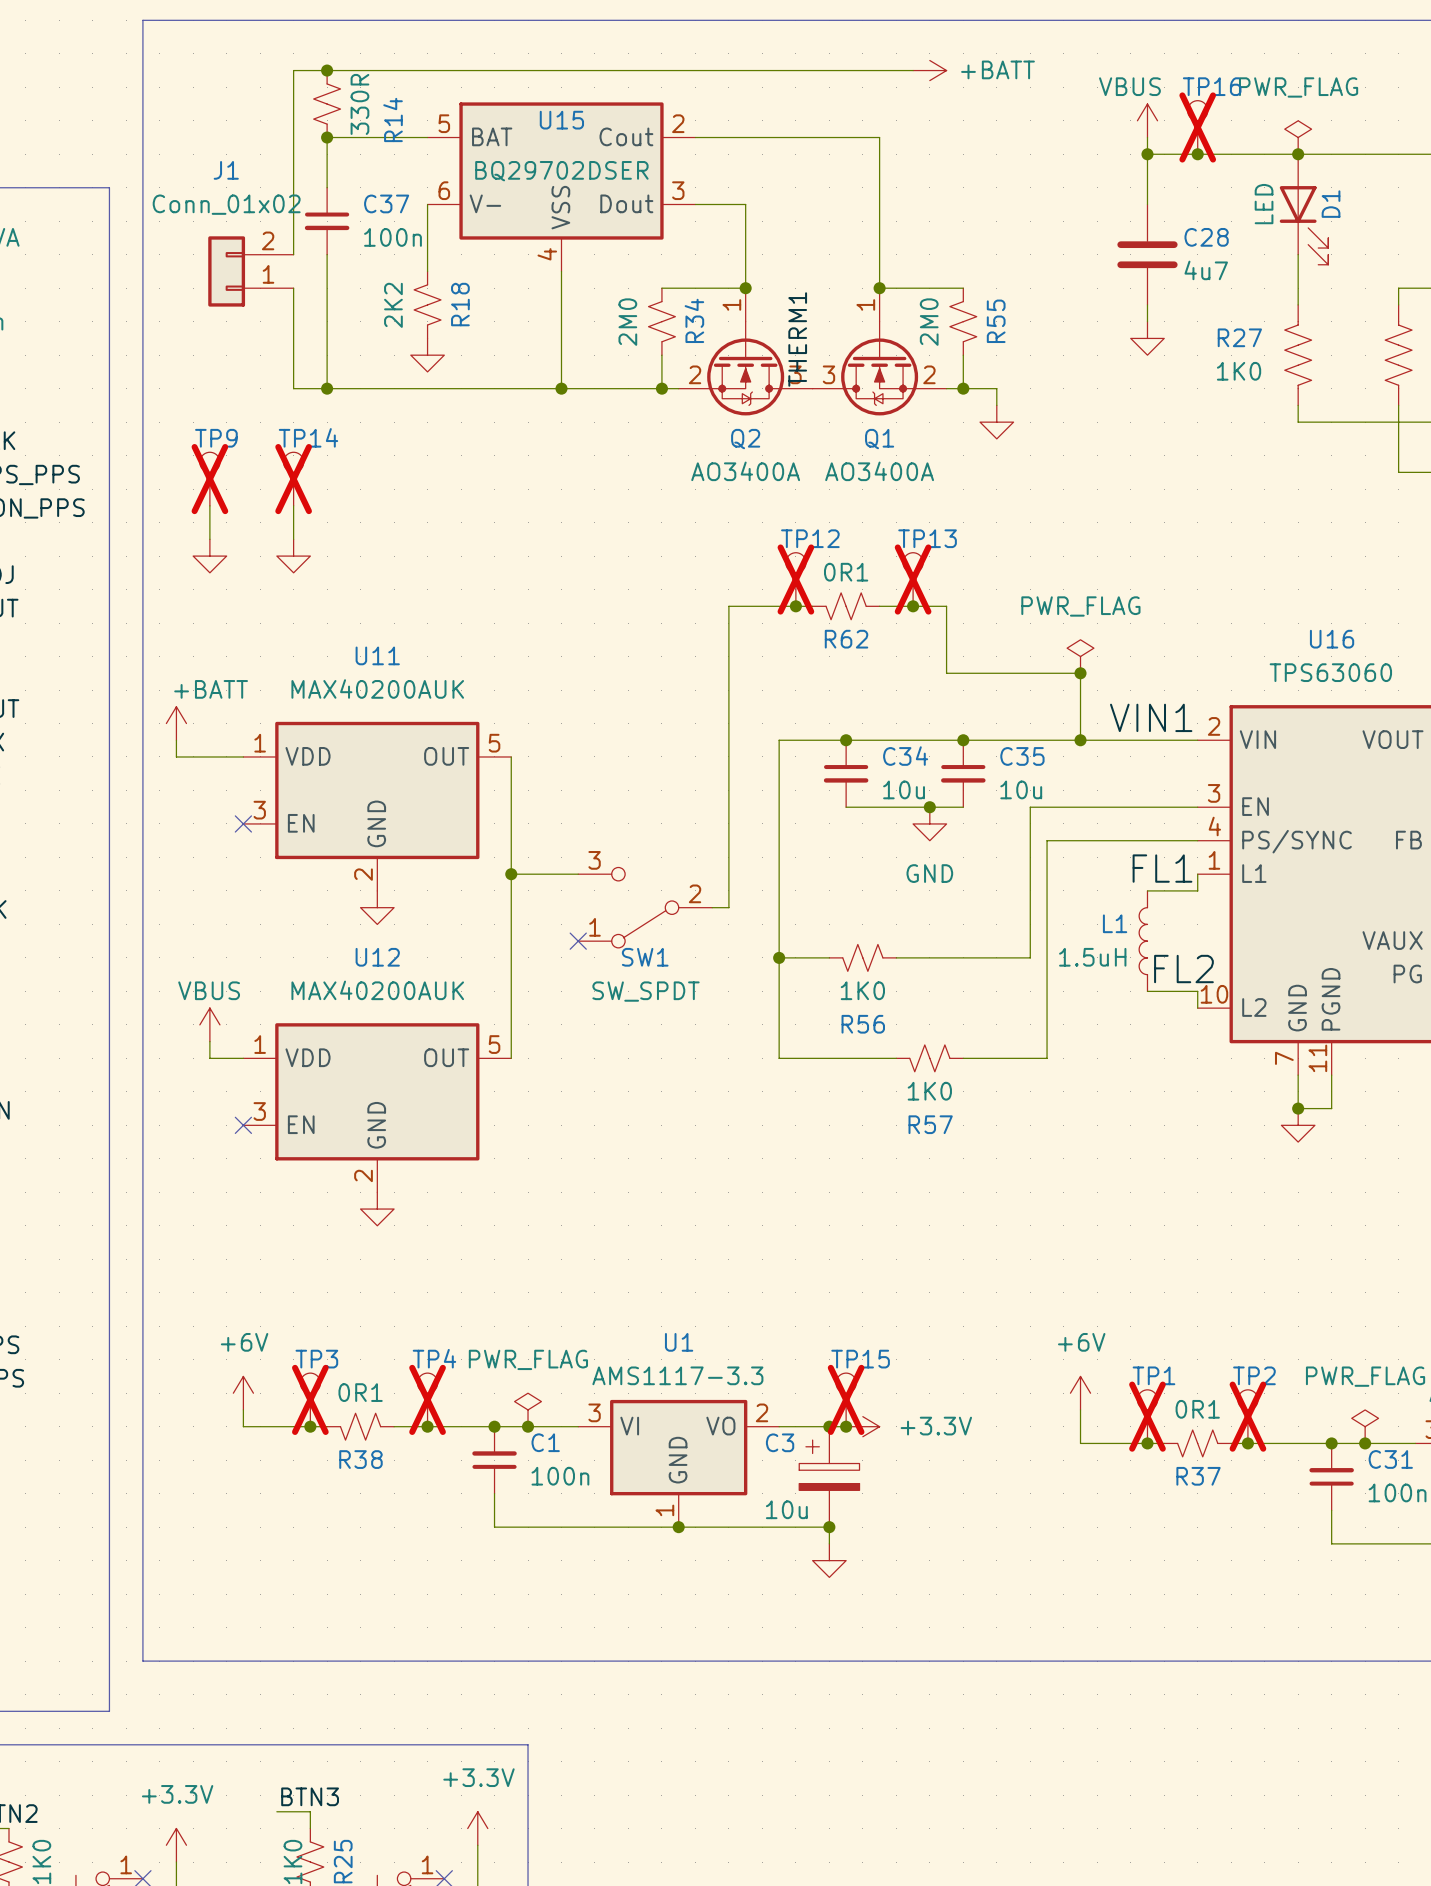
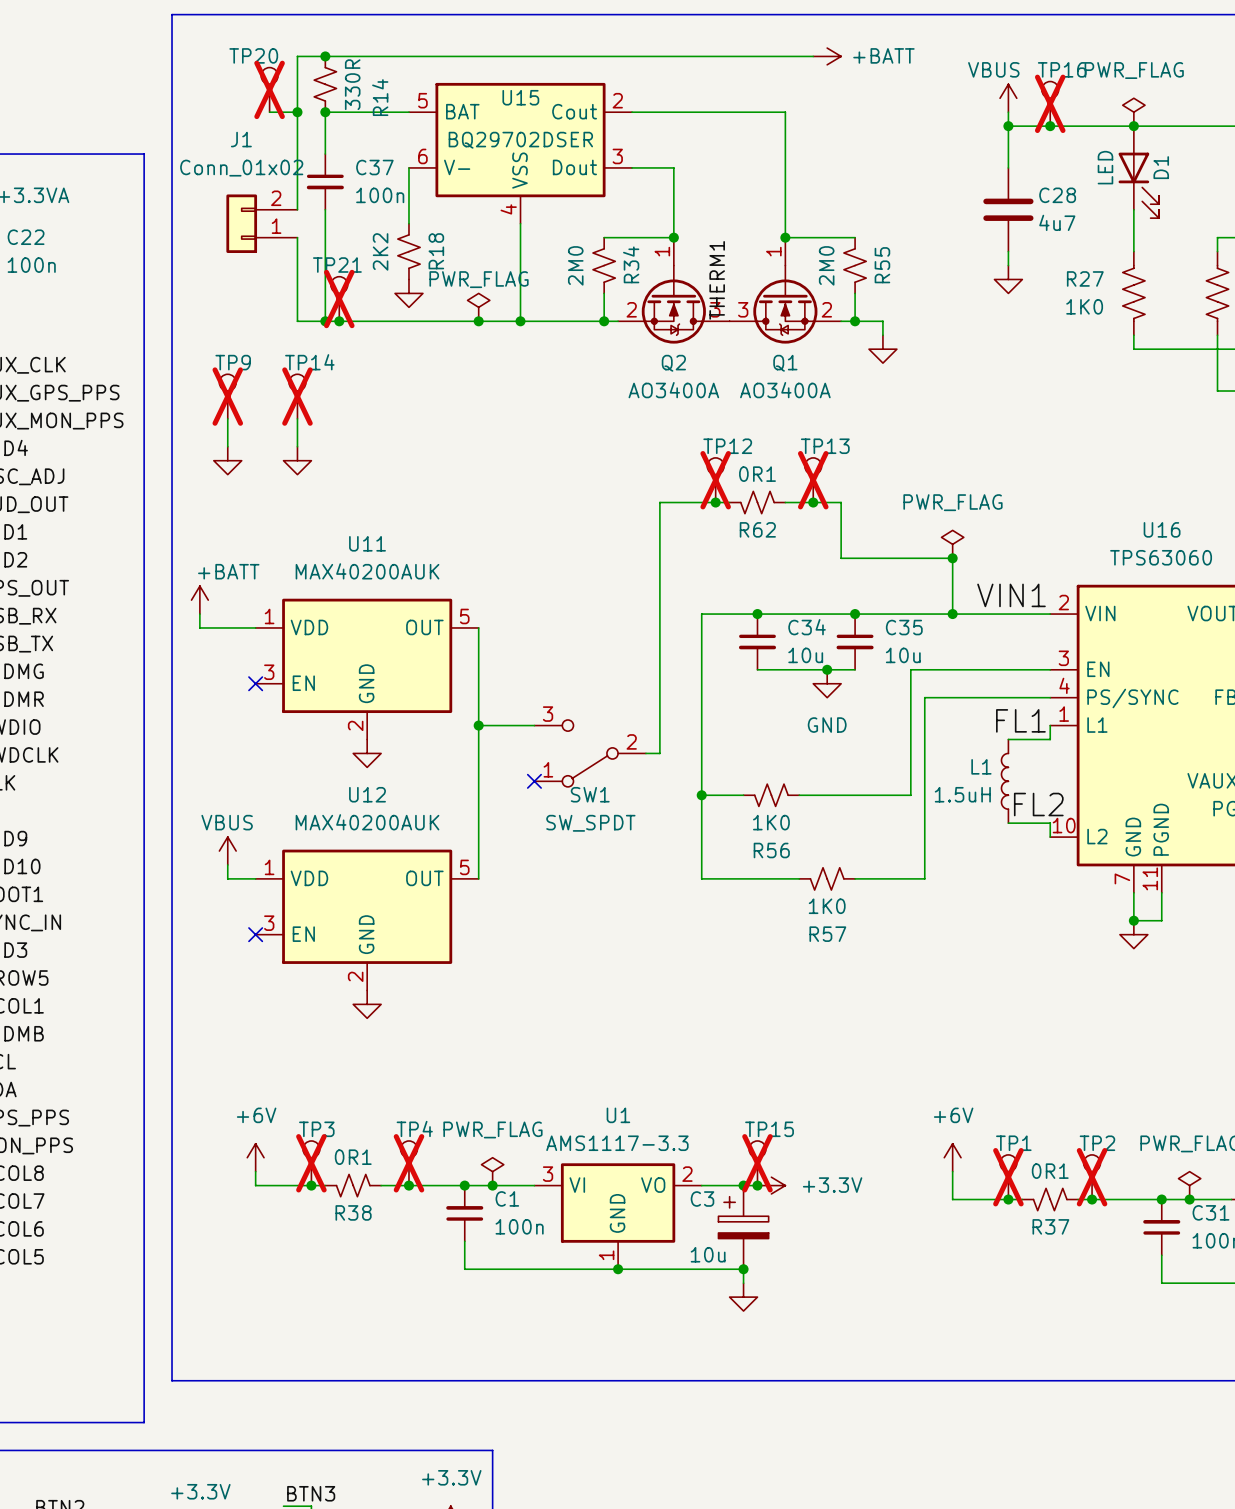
TP20: none -> (269, 89)
wire: none -> (269, 112) (297, 112)
junction: none -> (297, 112)
TP21: none -> (339, 299)
power symbol: none -> PWR_FLAG (478, 307)
junction: none -> (339, 321)
junction: none -> (478, 321)

